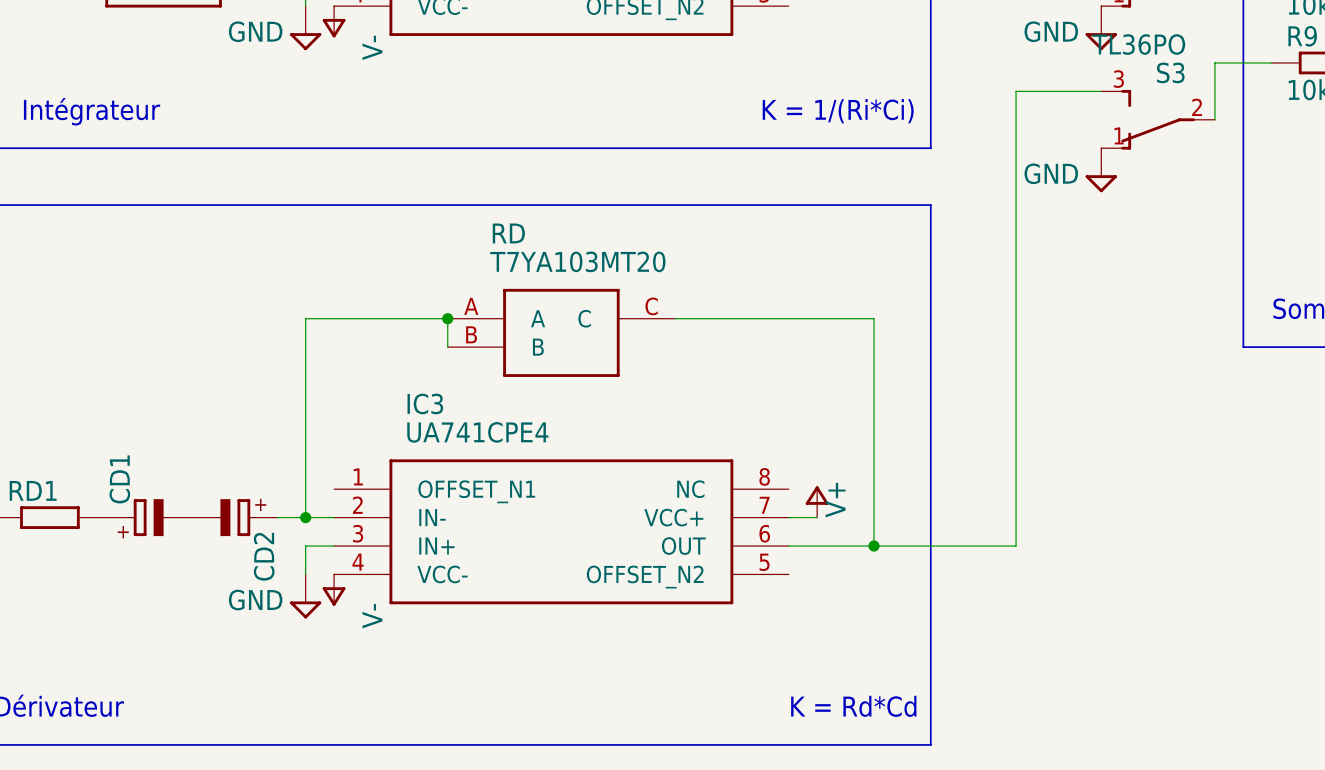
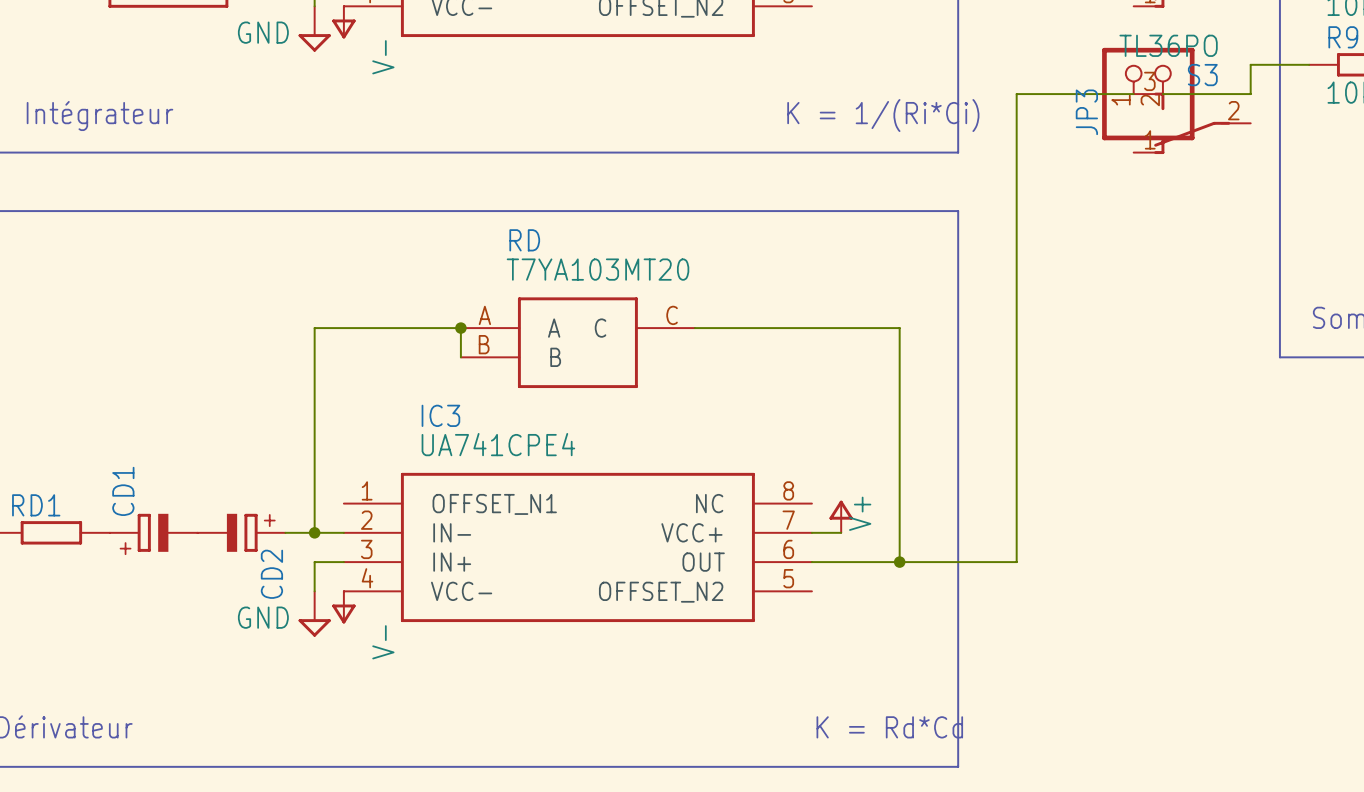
power symbol: GND (1101, 28) -> none
wire: (1016, 91) (1016, 546) (987, 546) -> (1045, 94) (1016, 94) (1016, 562)
JP3: none -> (1148, 94)
wire: (1214, 91) (1214, 119) -> (1250, 94) (1162, 94)
power symbol: GND (1101, 170) -> none

